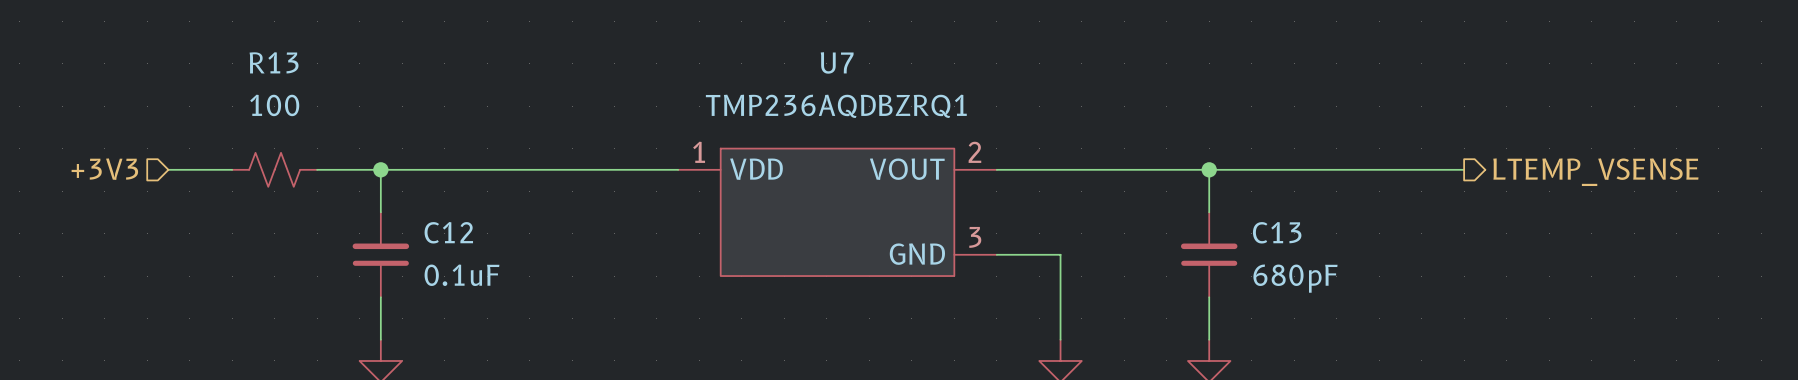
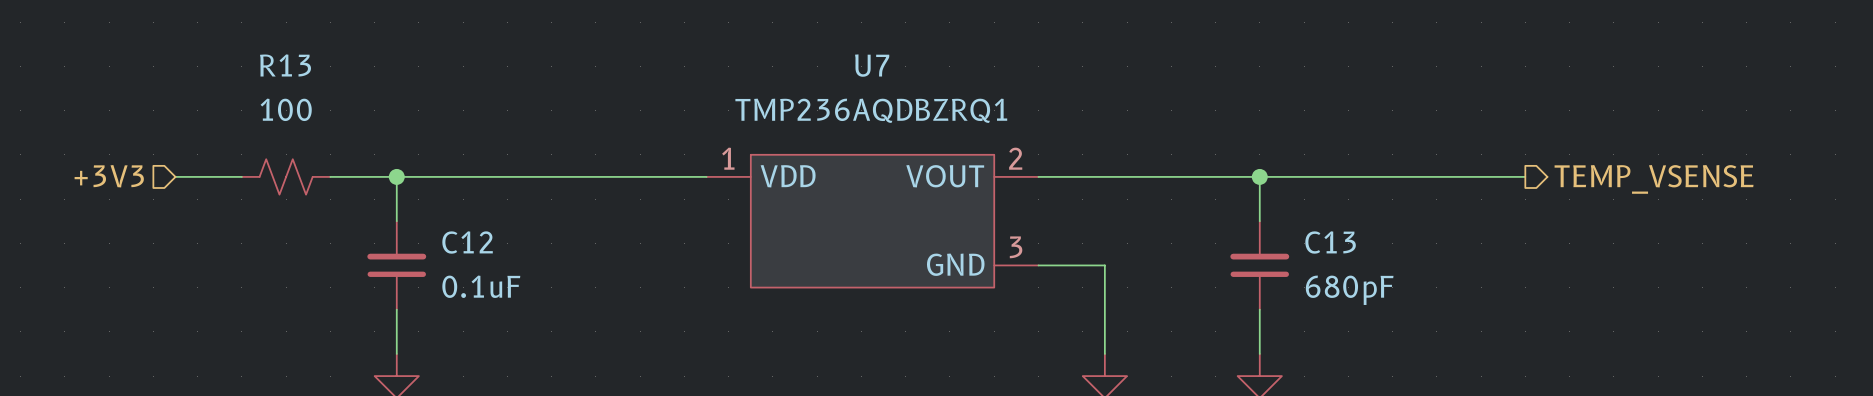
hierarchical label: LTEMP_VSENSE (1595, 172) -> TEMP_VSENSE (1654, 179)

